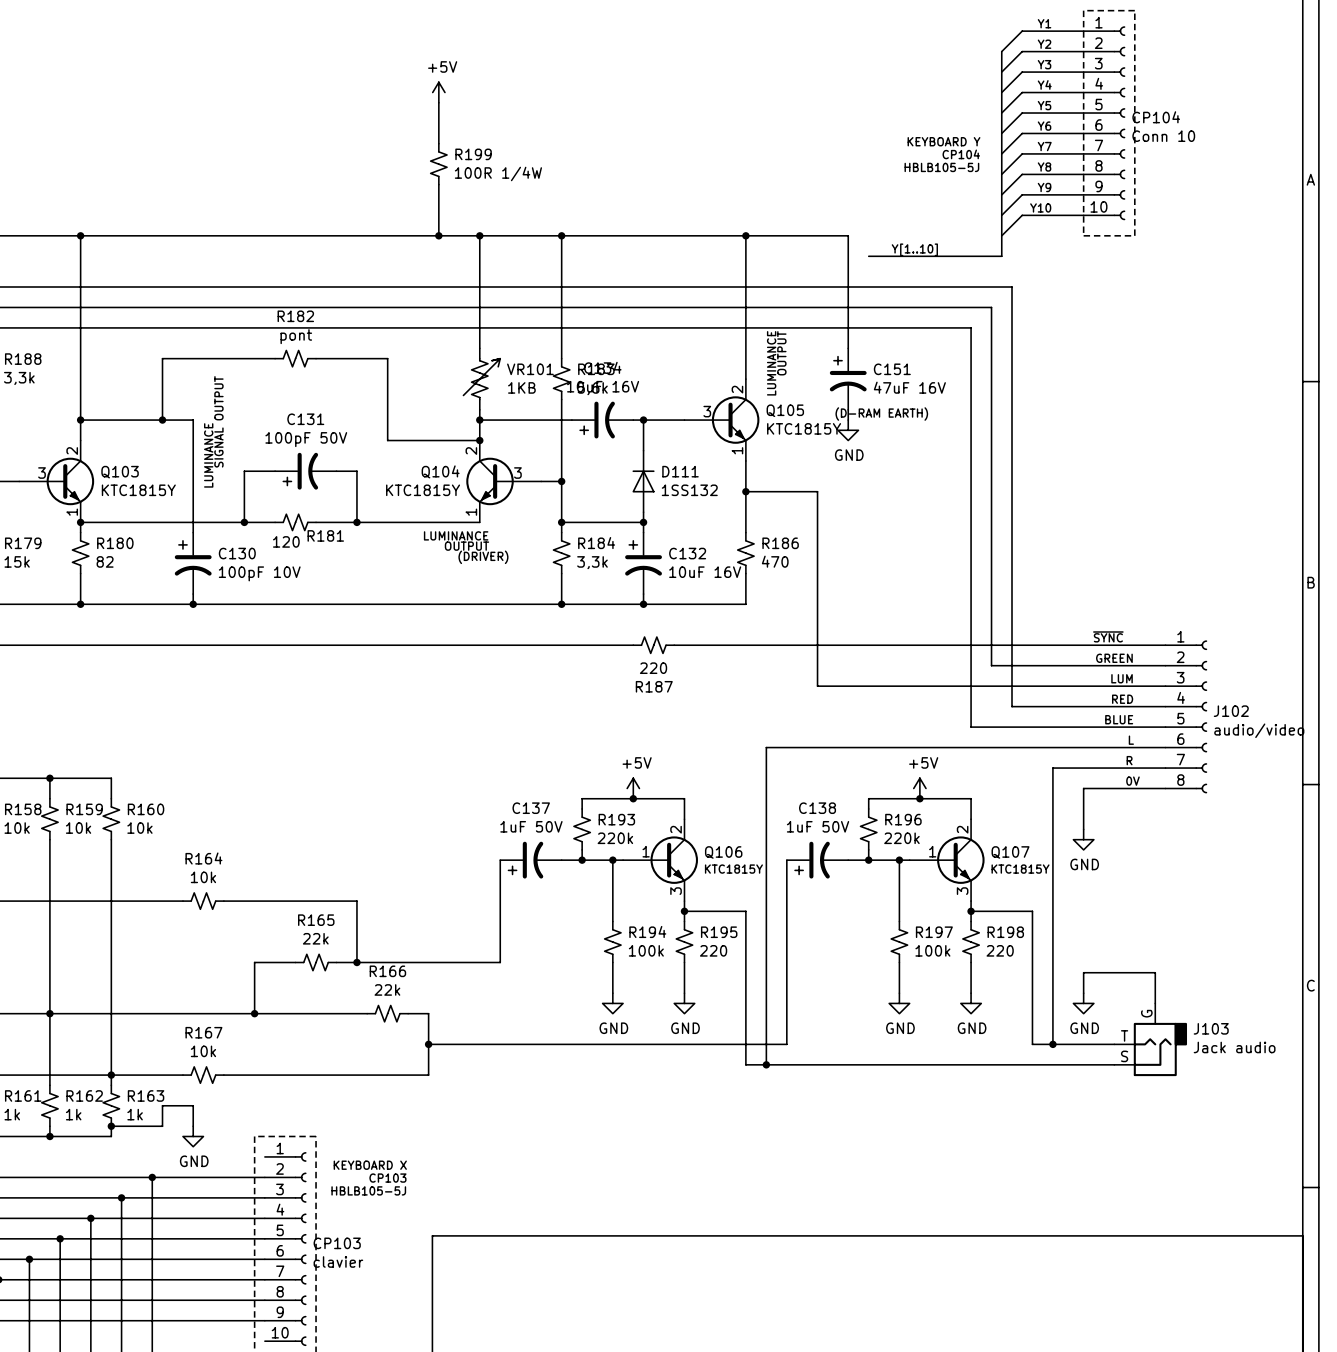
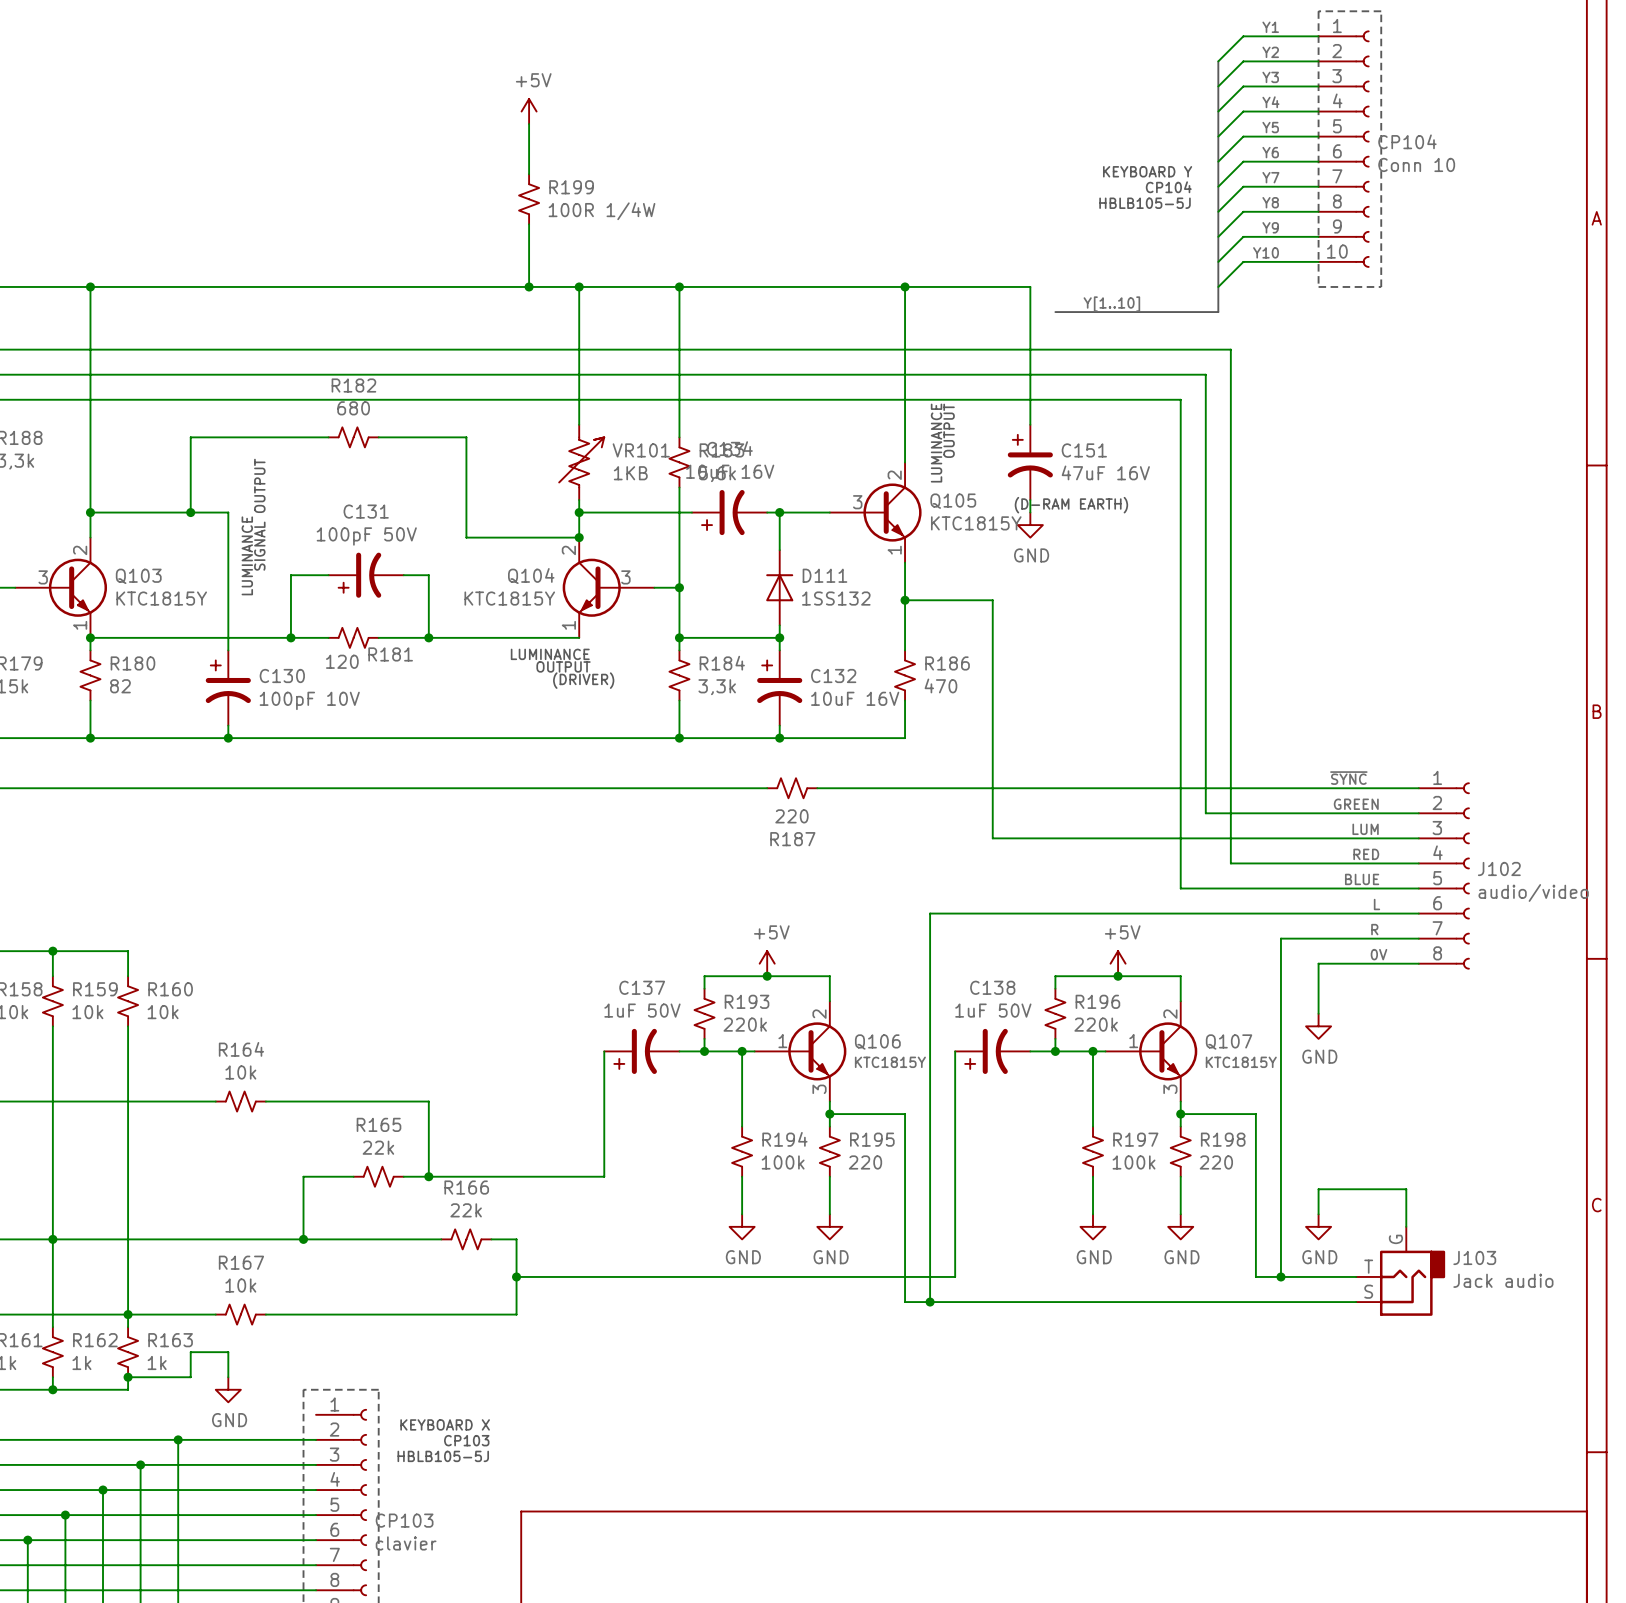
R182 value: pont (296, 336) -> 680 (353, 408)

